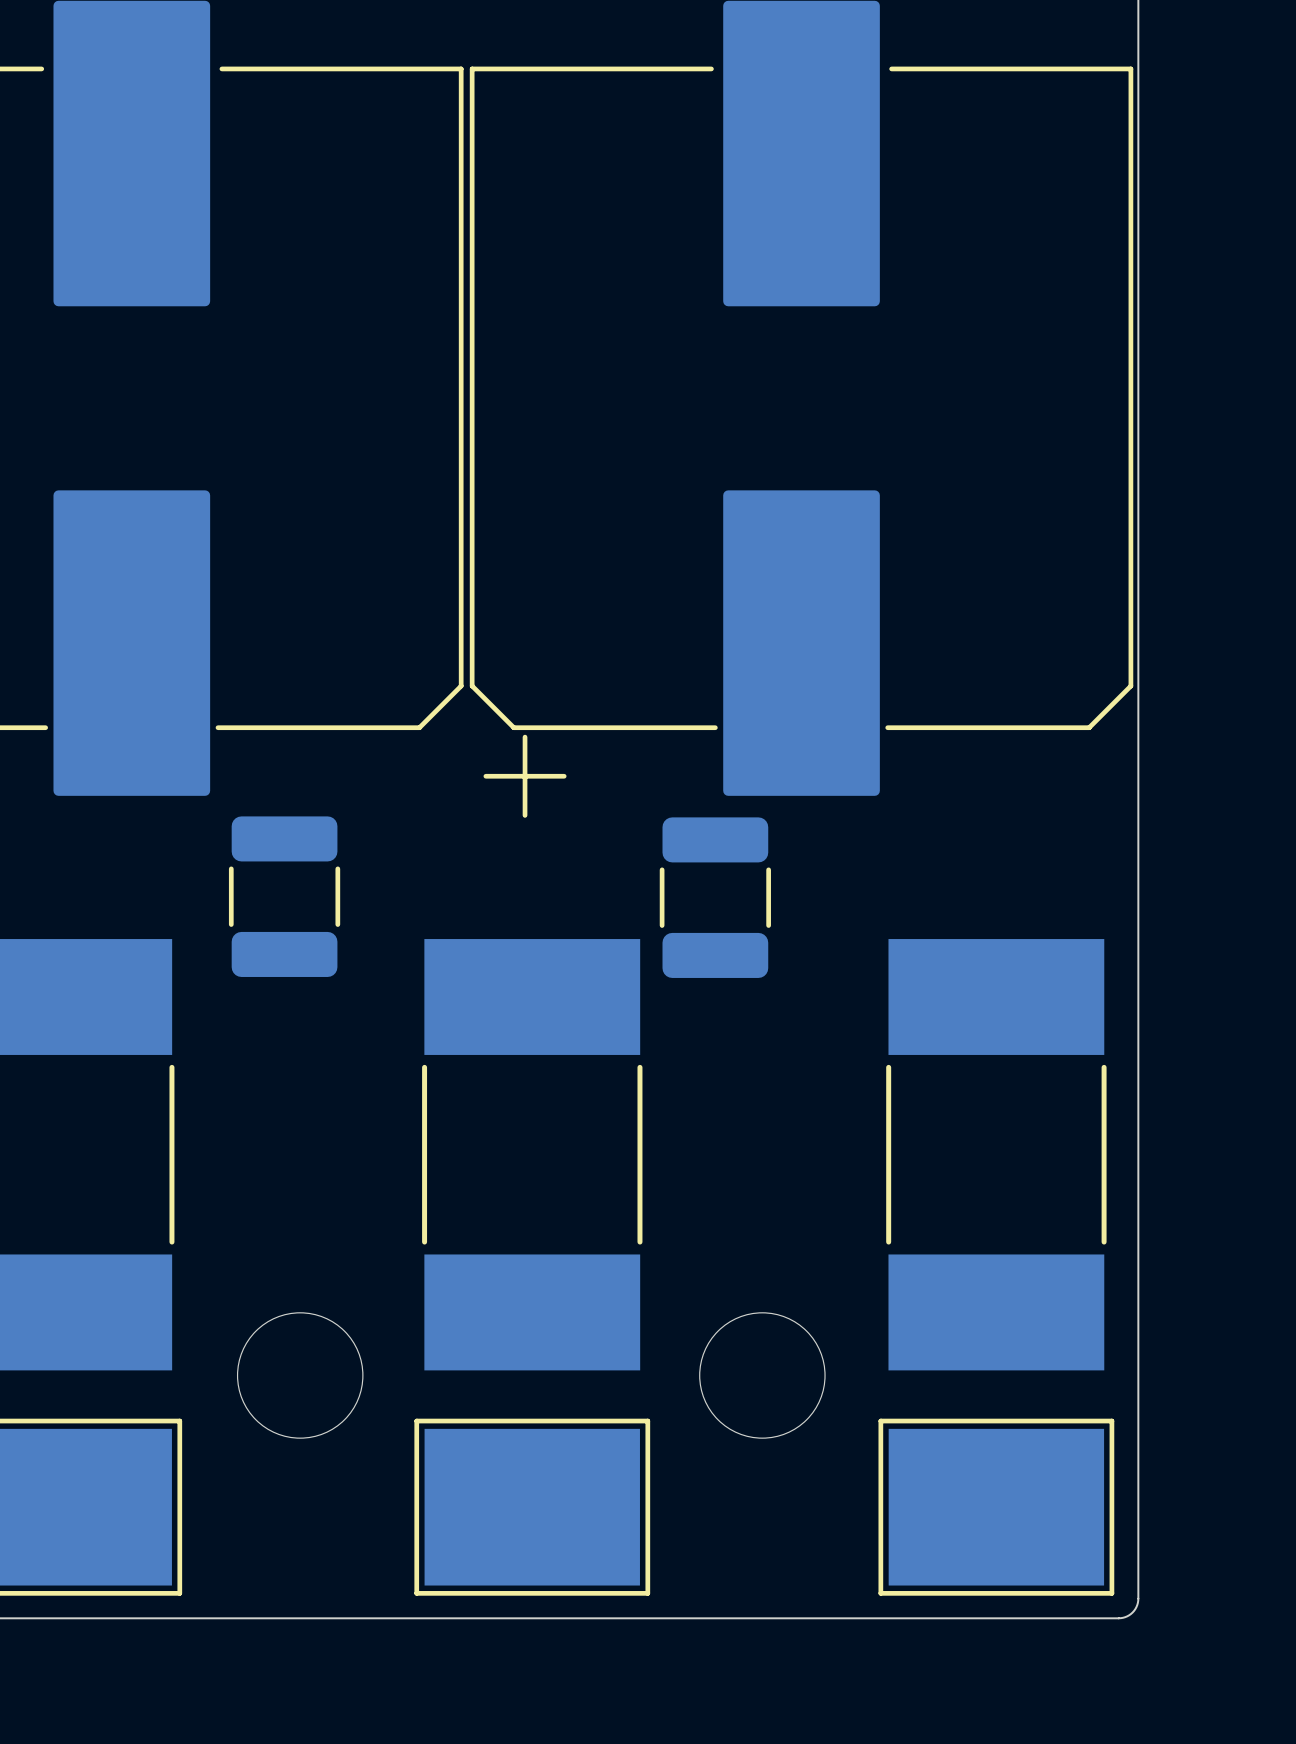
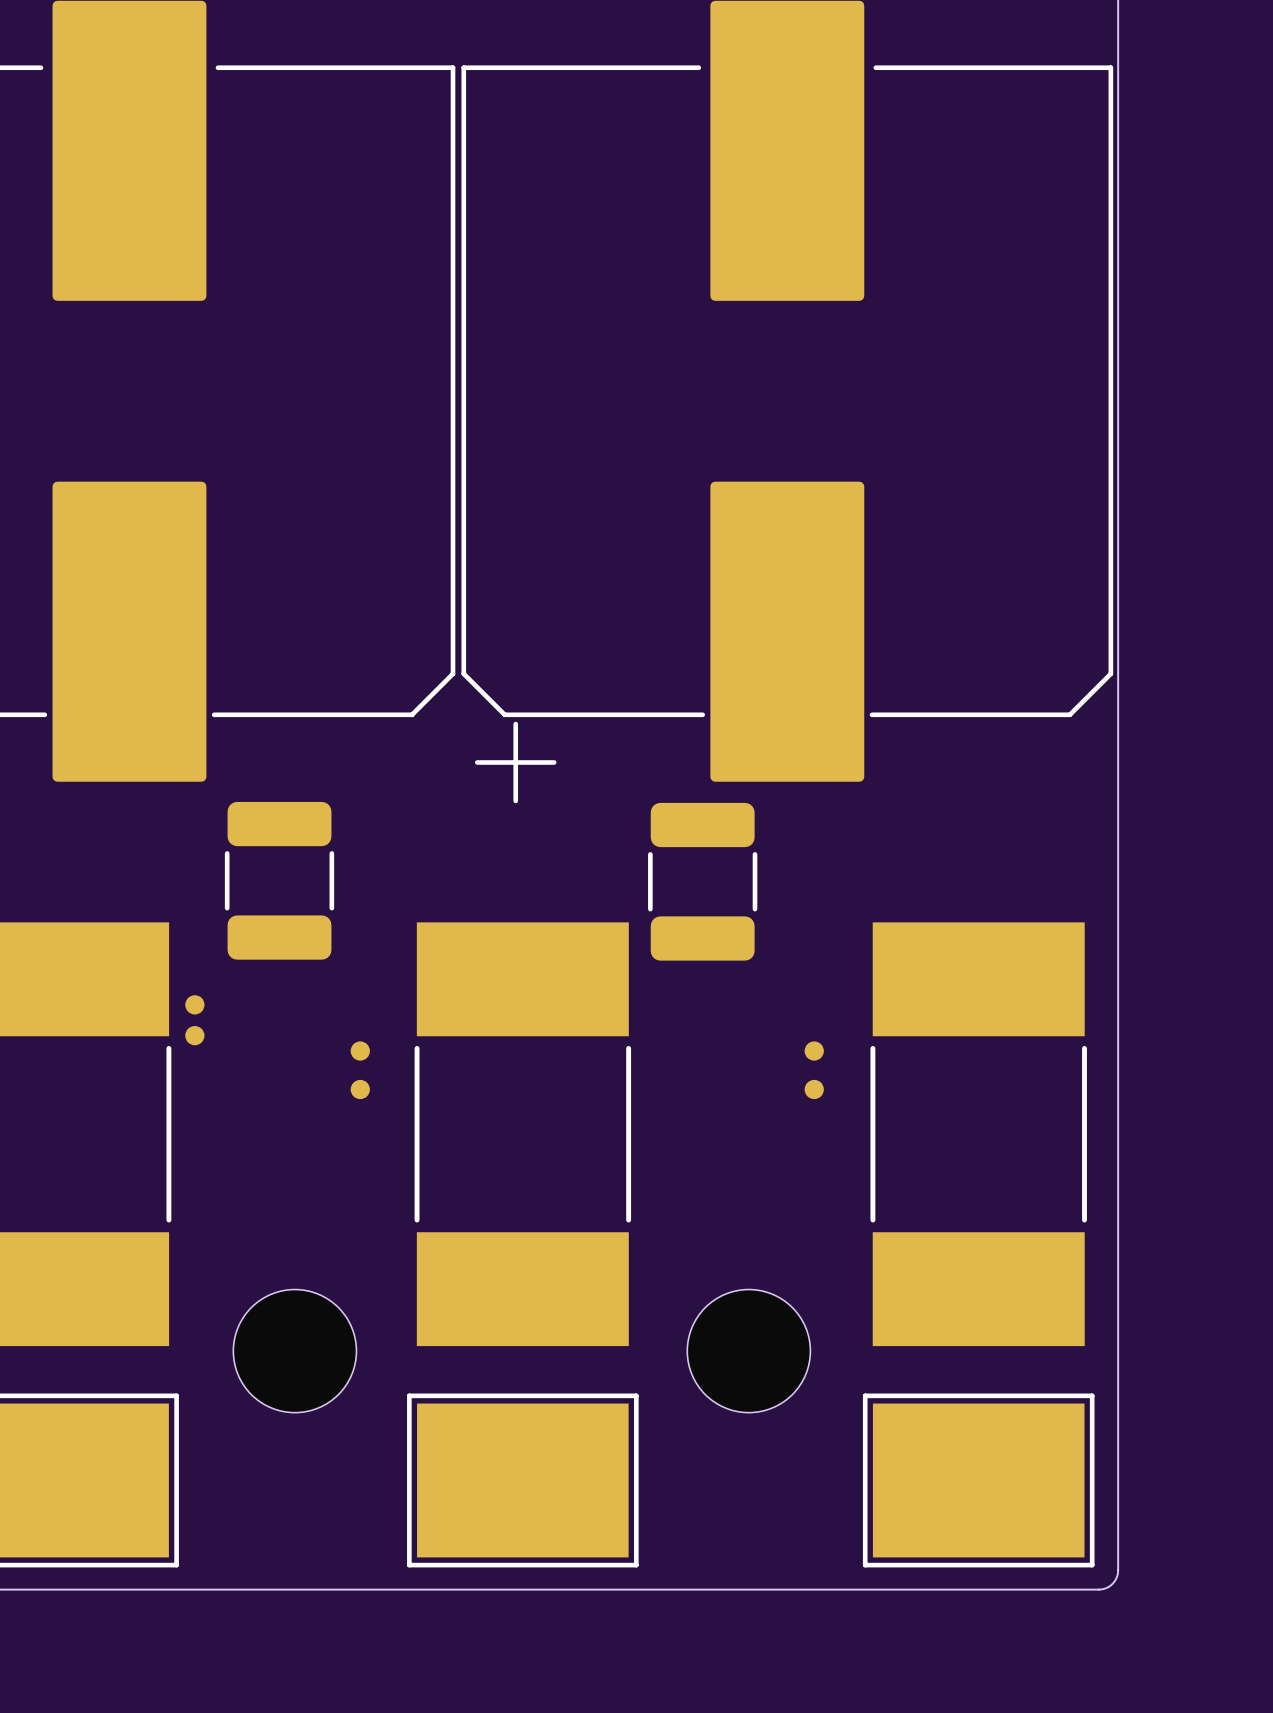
part: none -> (194, 1020)
part: none -> (360, 1070)
part: none -> (814, 1070)

